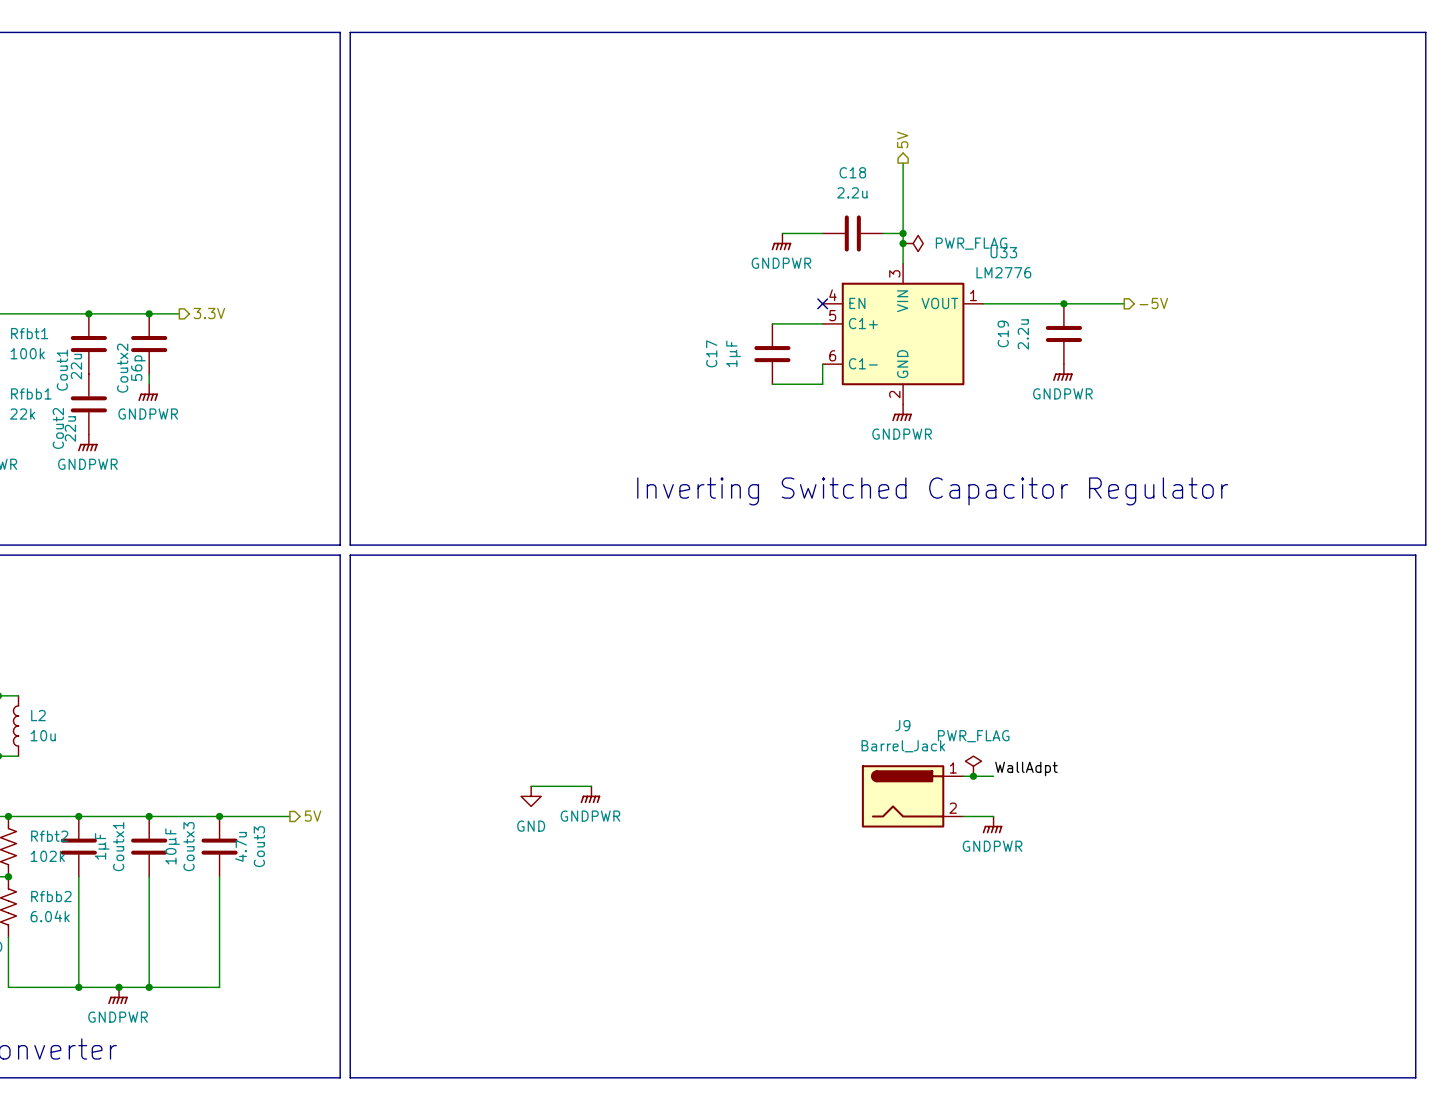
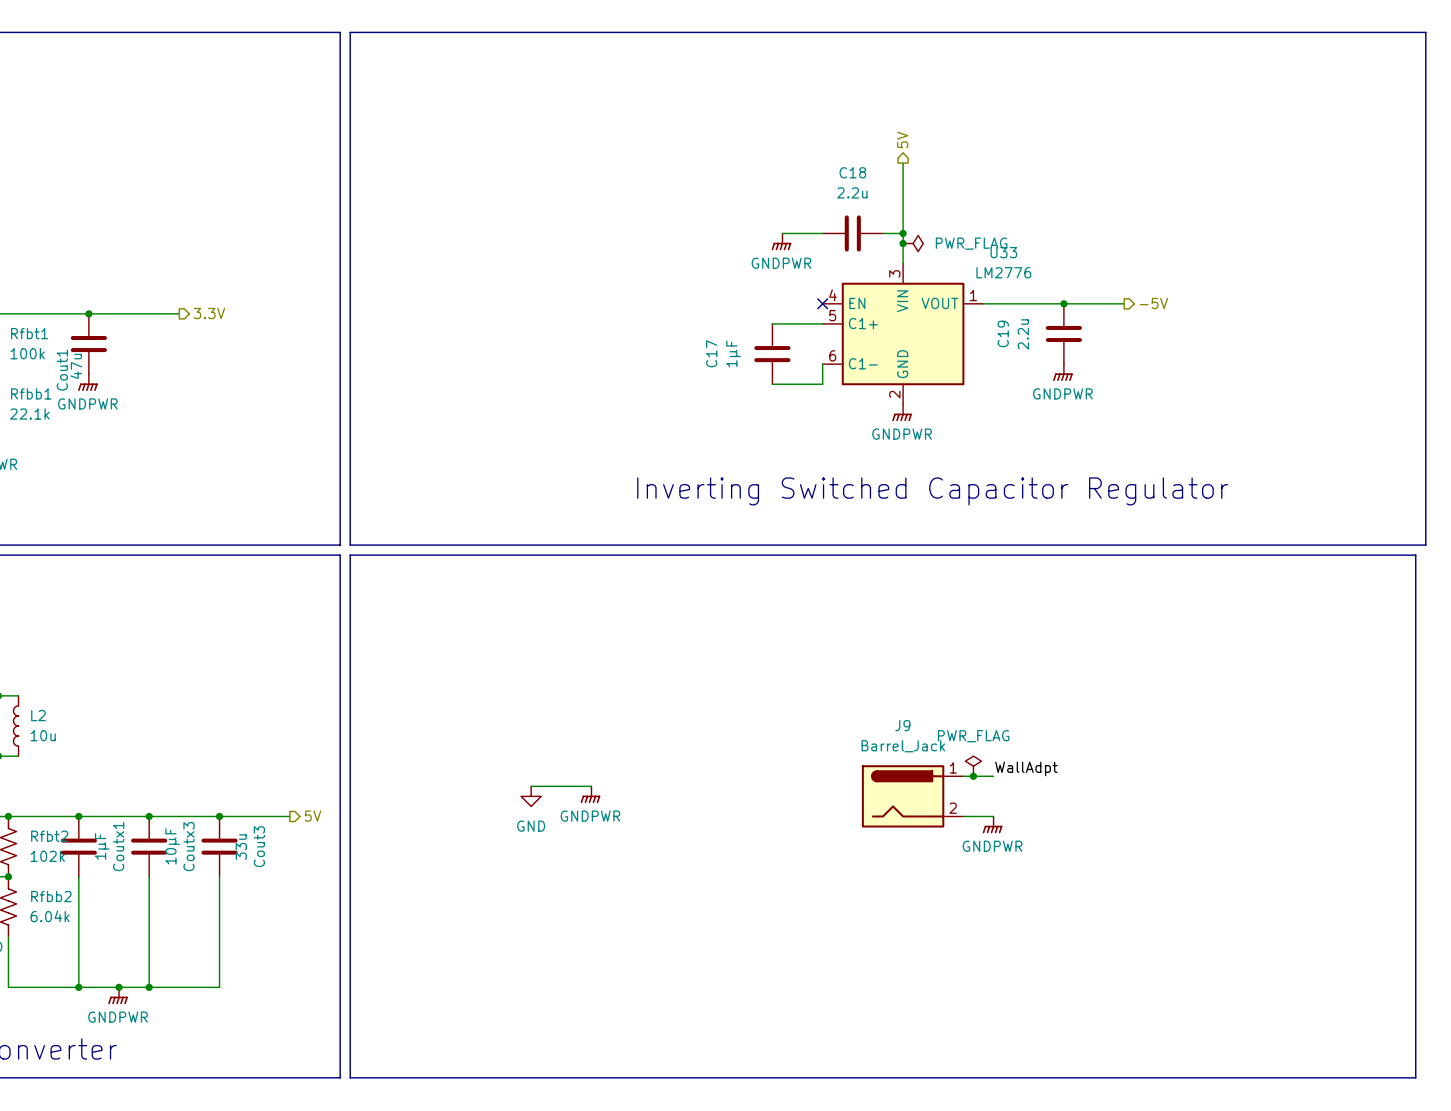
junction: (149, 313) -> none
Coutx2: 56p (149, 344) -> none
Cout1 value: 22u (76, 366) -> 47u (76, 366)
wire: (149, 374) (149, 384) -> none
power symbol: none -> GNDPWR (87, 382)
power symbol: GNDPWR (148, 392) -> none
Cout2: 22u (88, 404) -> none
Rfbb1 value: 22k (22, 414) -> 22.1k (29, 414)
power symbol: GNDPWR (87, 442) -> none
Cout3 value: 4.7u (241, 846) -> 33u (241, 847)

